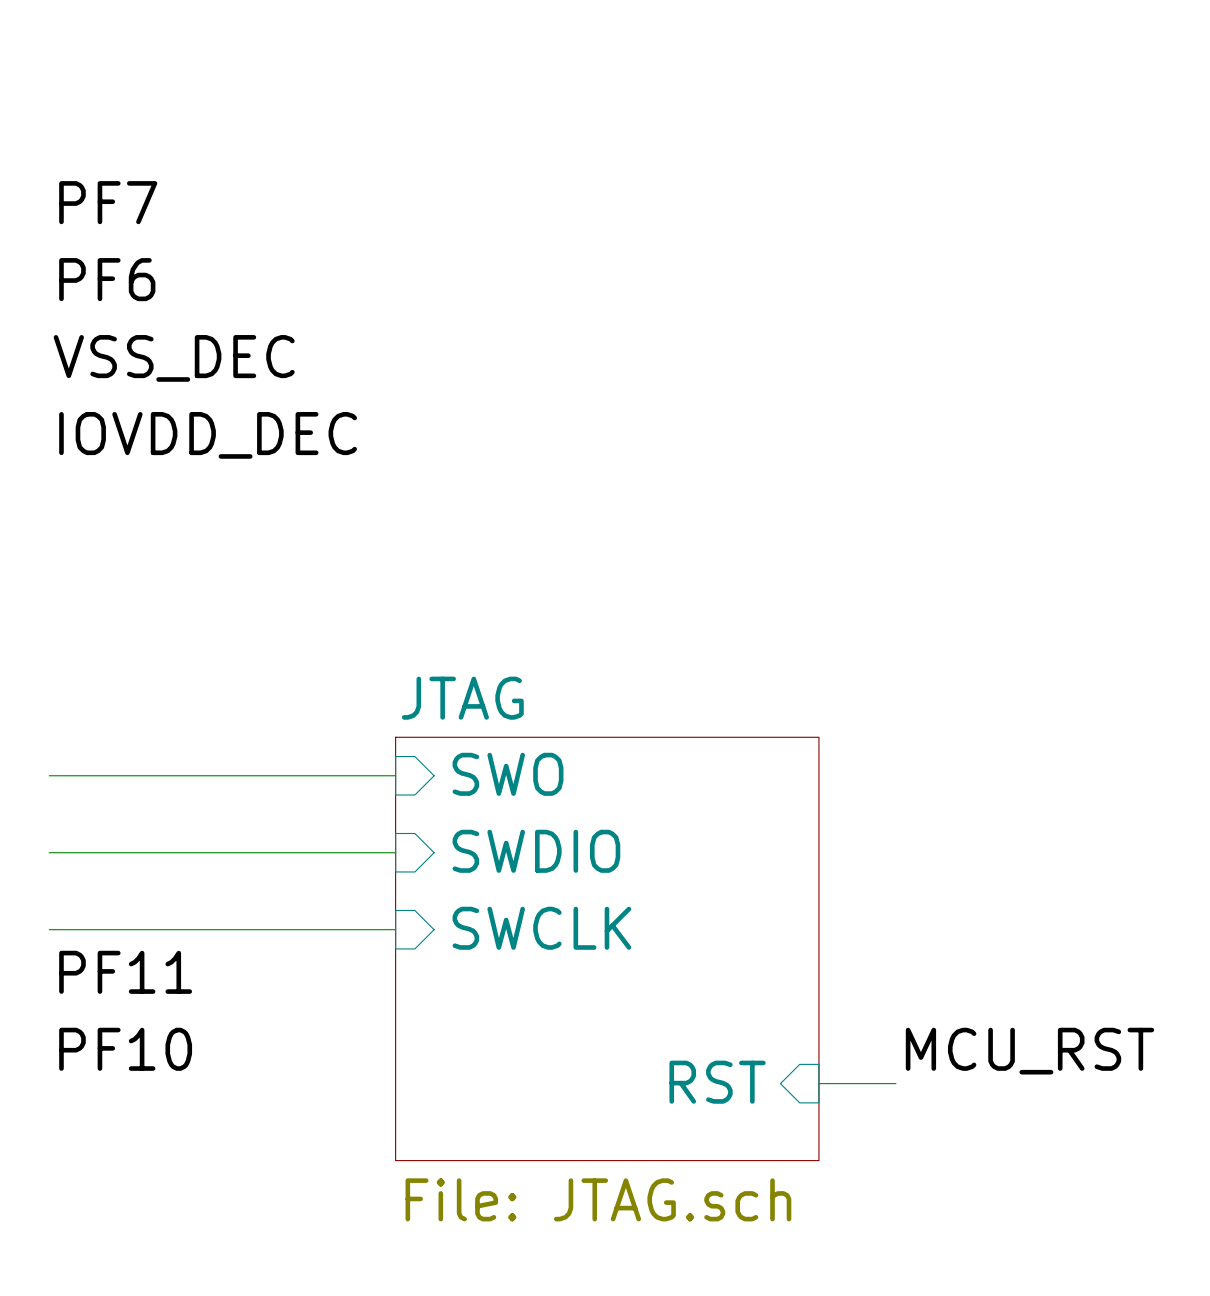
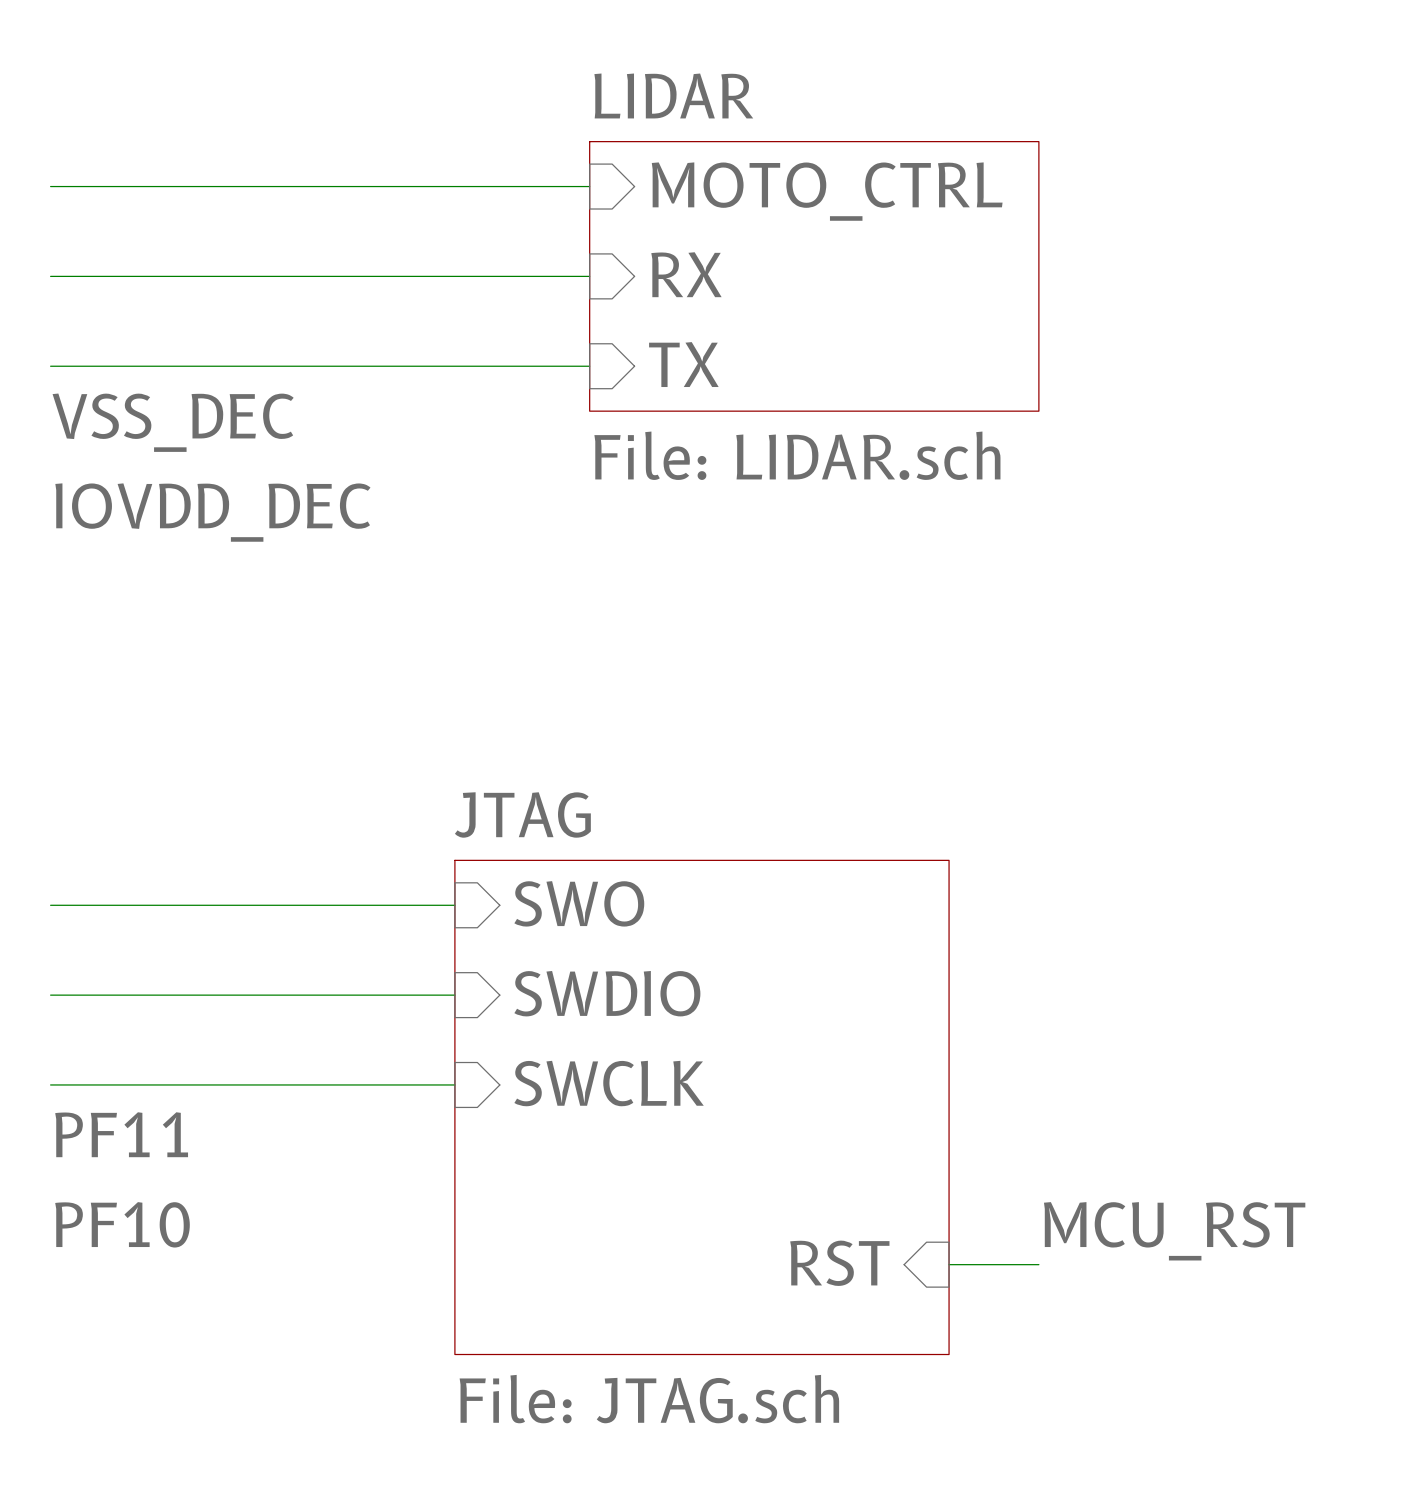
wire: none -> (50, 186) (589, 186)
sheet pin: none -> MOTO_CTRL (827, 191)
label: PF7 (108, 202) -> none
sheet pin: none -> RX (686, 274)
wire: none -> (50, 276) (589, 276)
sheet LIDAR: none -> File: LIDAR.sch (814, 276)
label: PF6 (107, 279) -> none
sheet pin: none -> TX (683, 364)
wire: none -> (50, 366) (589, 366)

